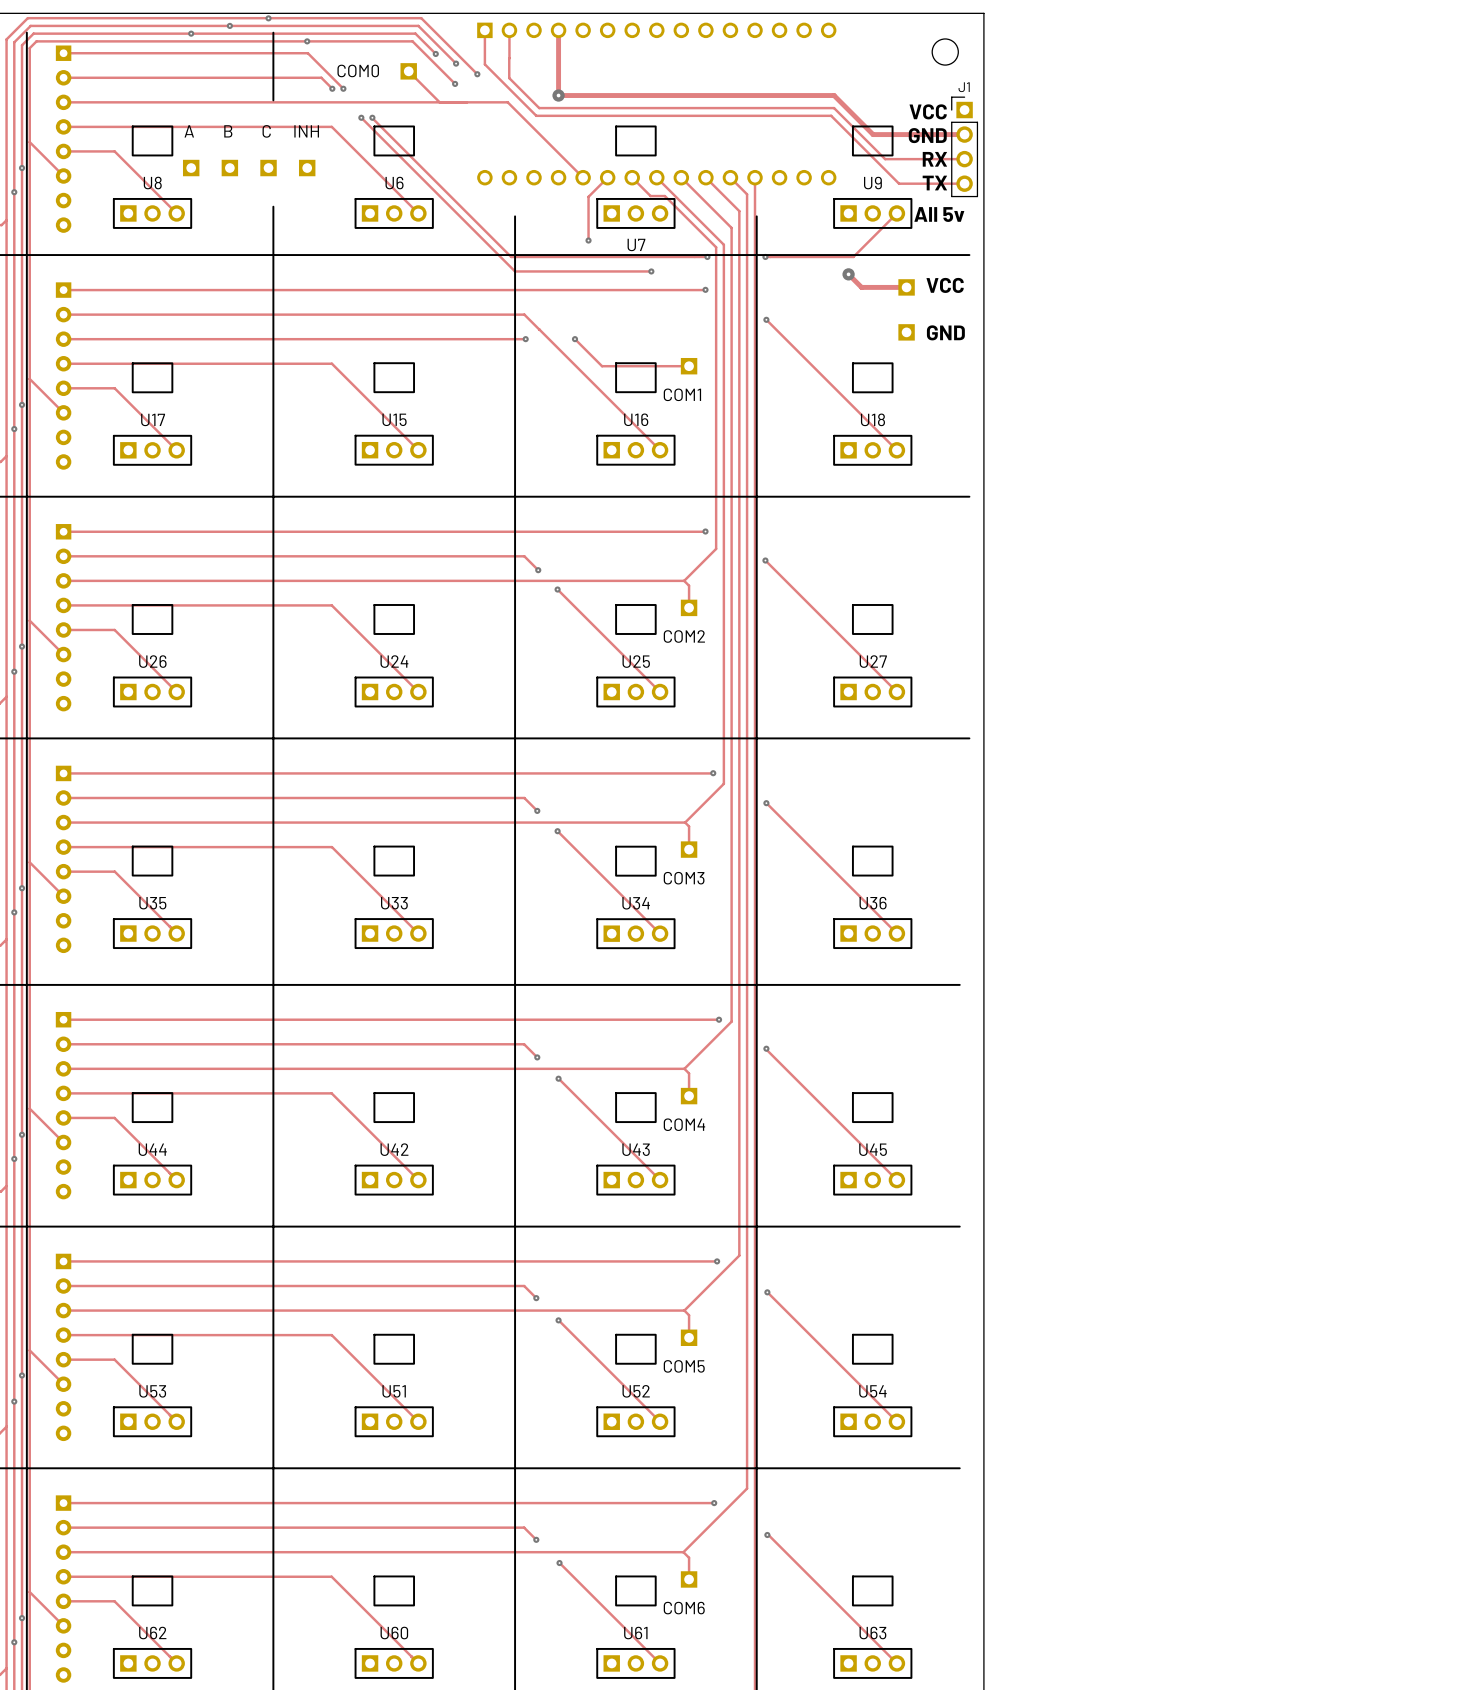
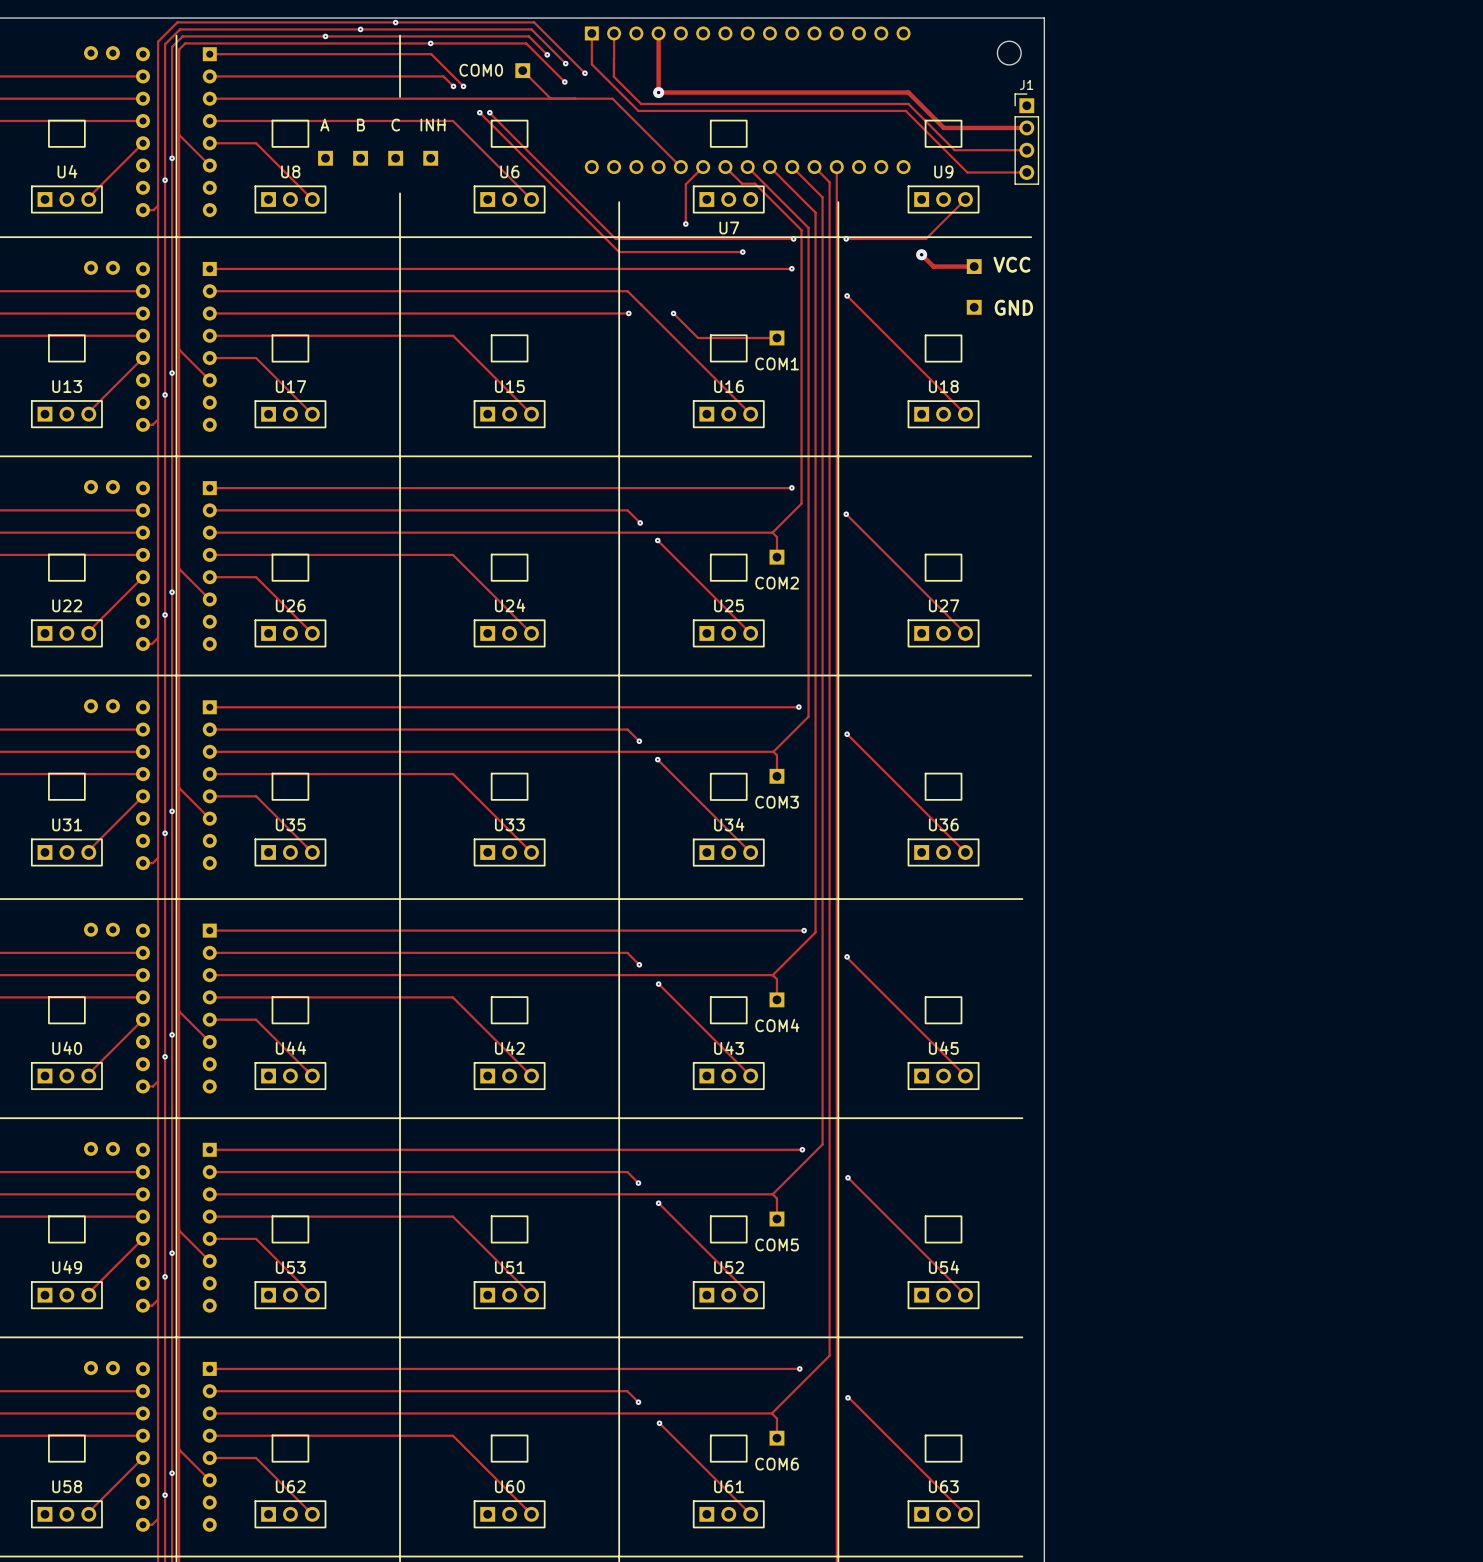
text: VCC (928, 111) -> none
text: GND (927, 135) -> none
text: RX (934, 159) -> none
text: TX (934, 183) -> none
text: All 5v (939, 214) -> none

